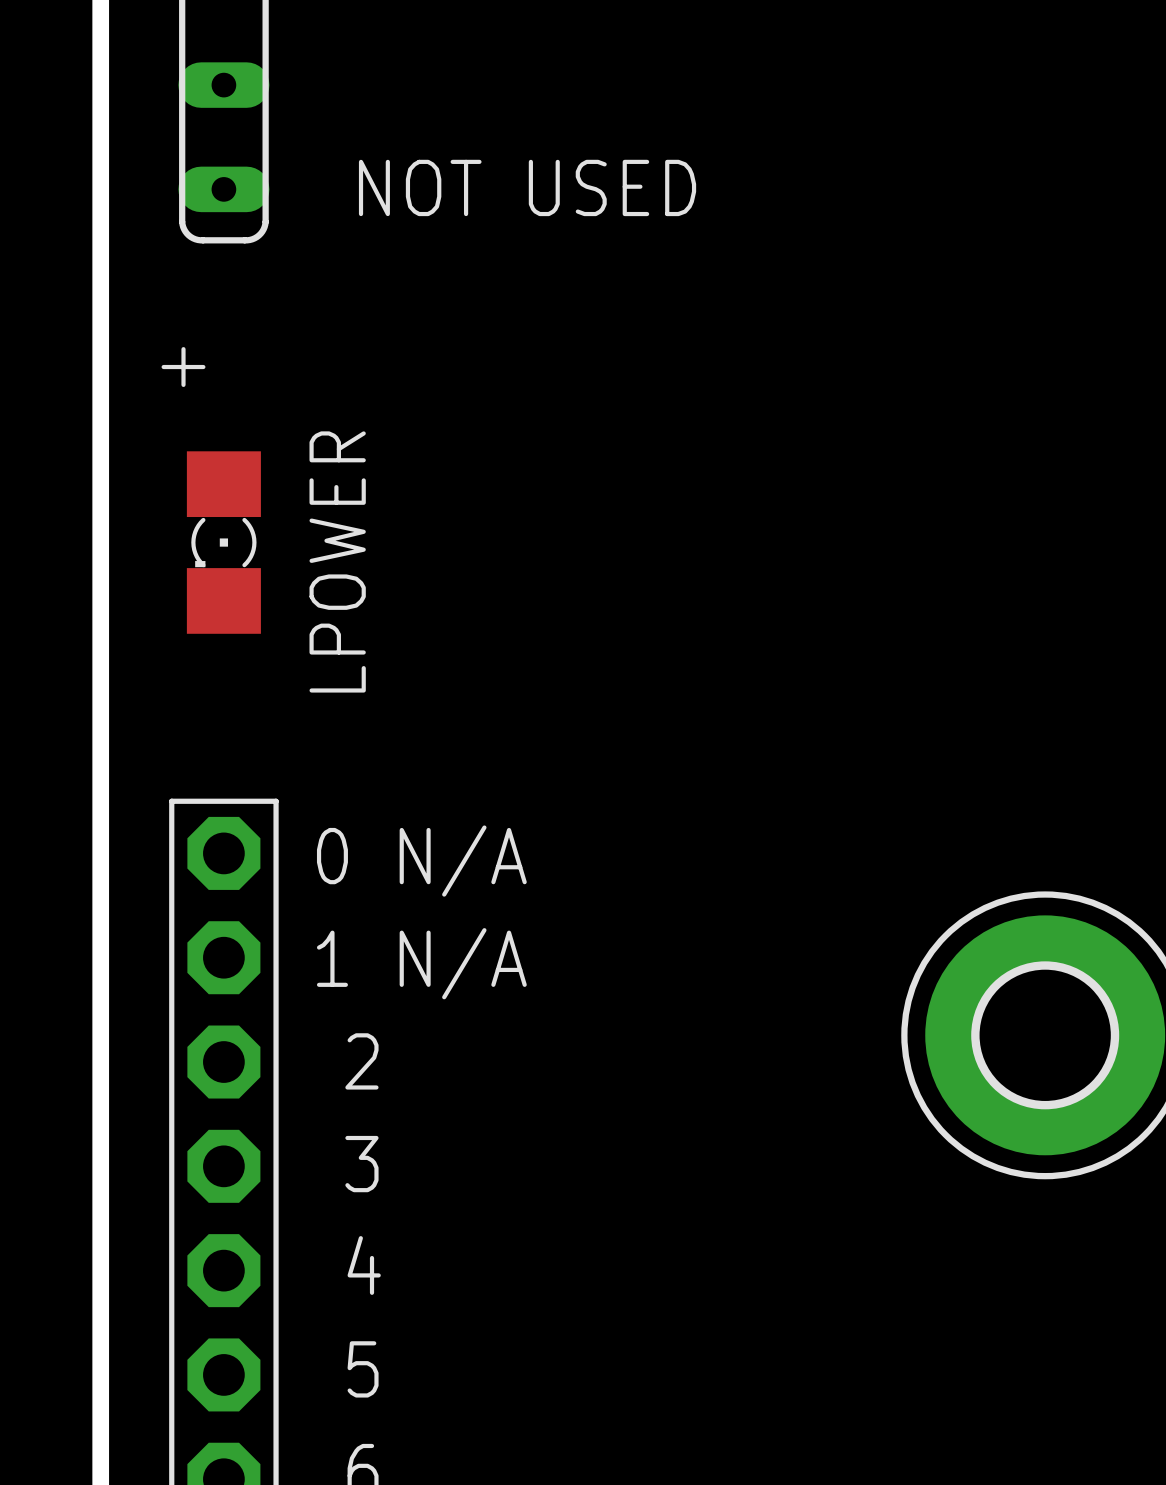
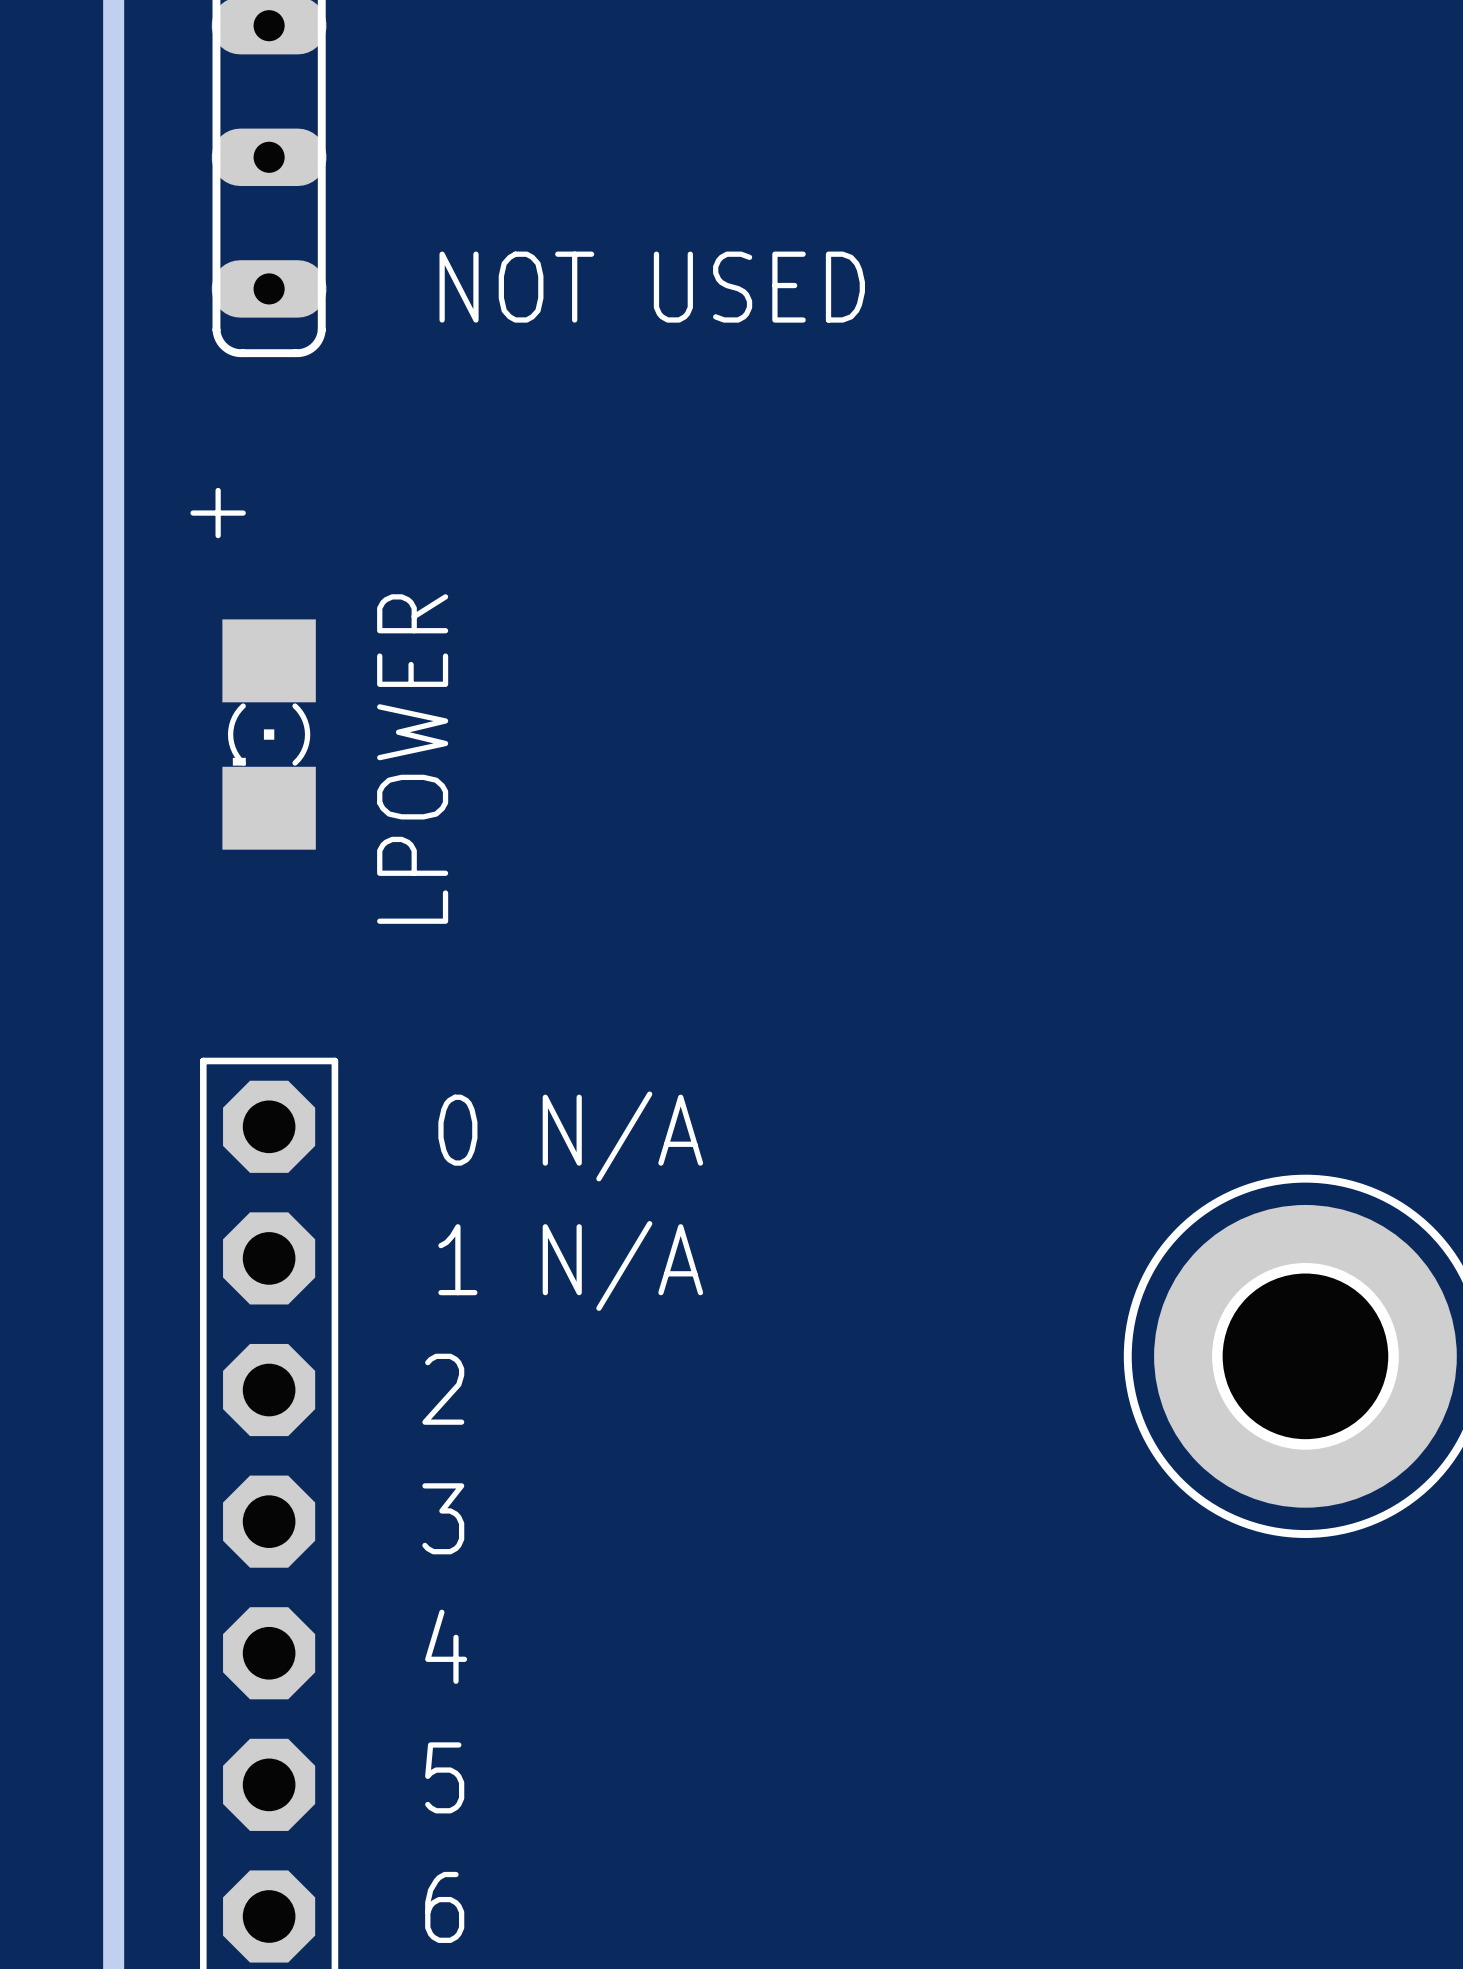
text position: 0 N/A (421, 861) -> 0 N/A (570, 1136)
text position: 1 N/A (421, 963) -> 1 N/A (570, 1265)

